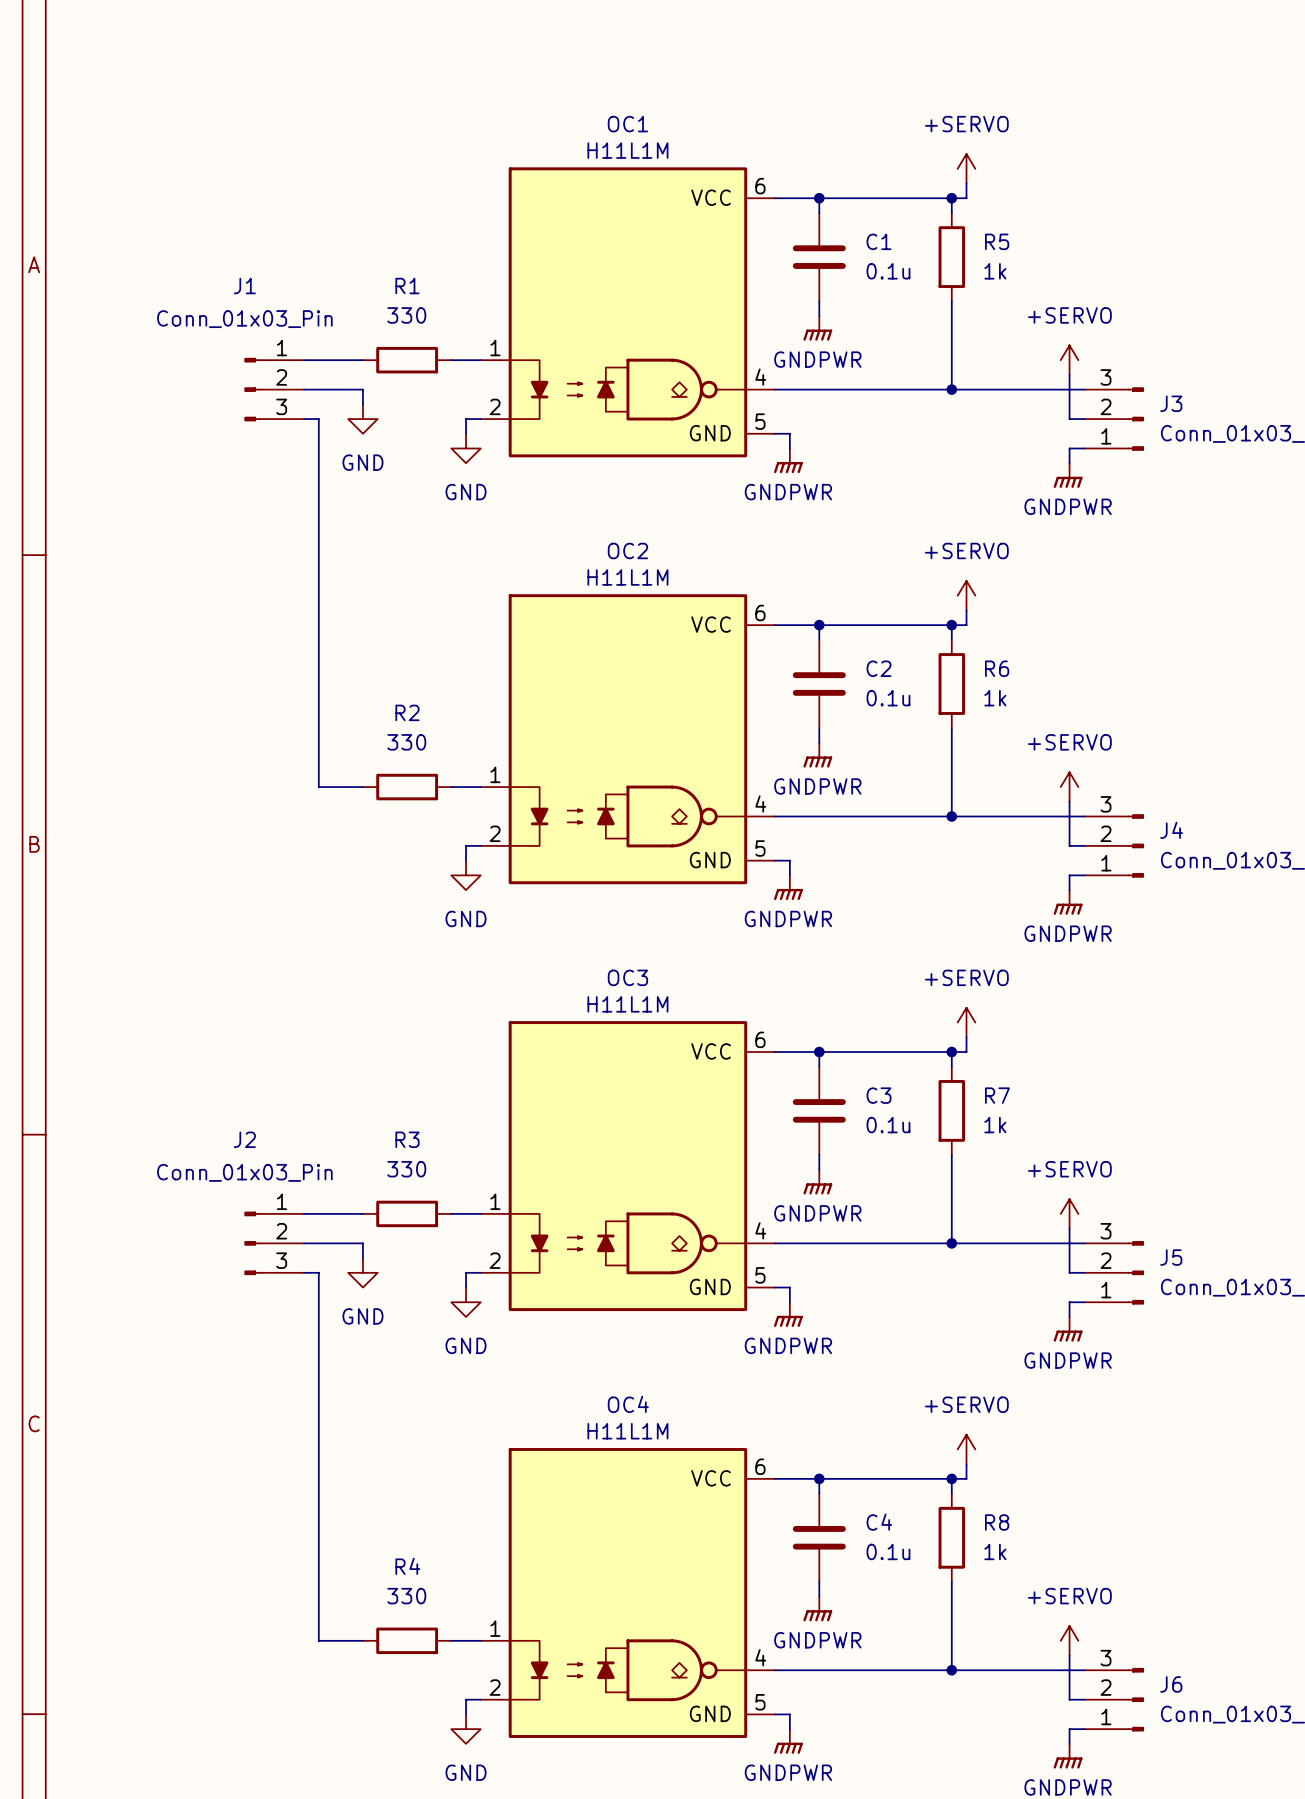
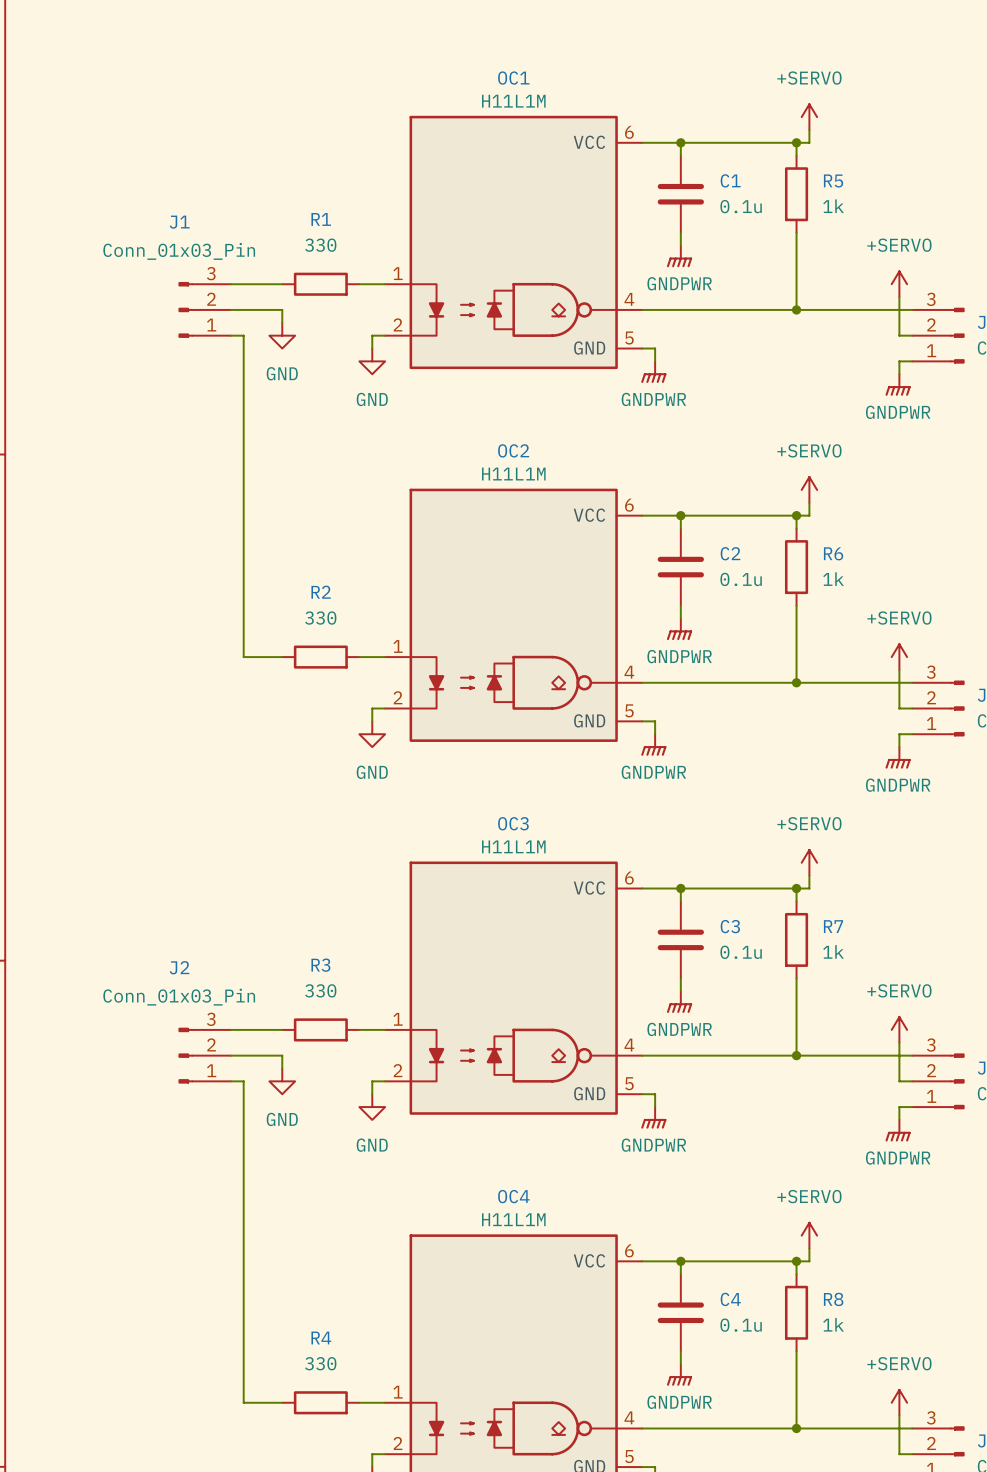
J1 flip: as is (252, 389) -> up-down (185, 309)
J2 flip: as is (252, 1243) -> up-down (185, 1055)

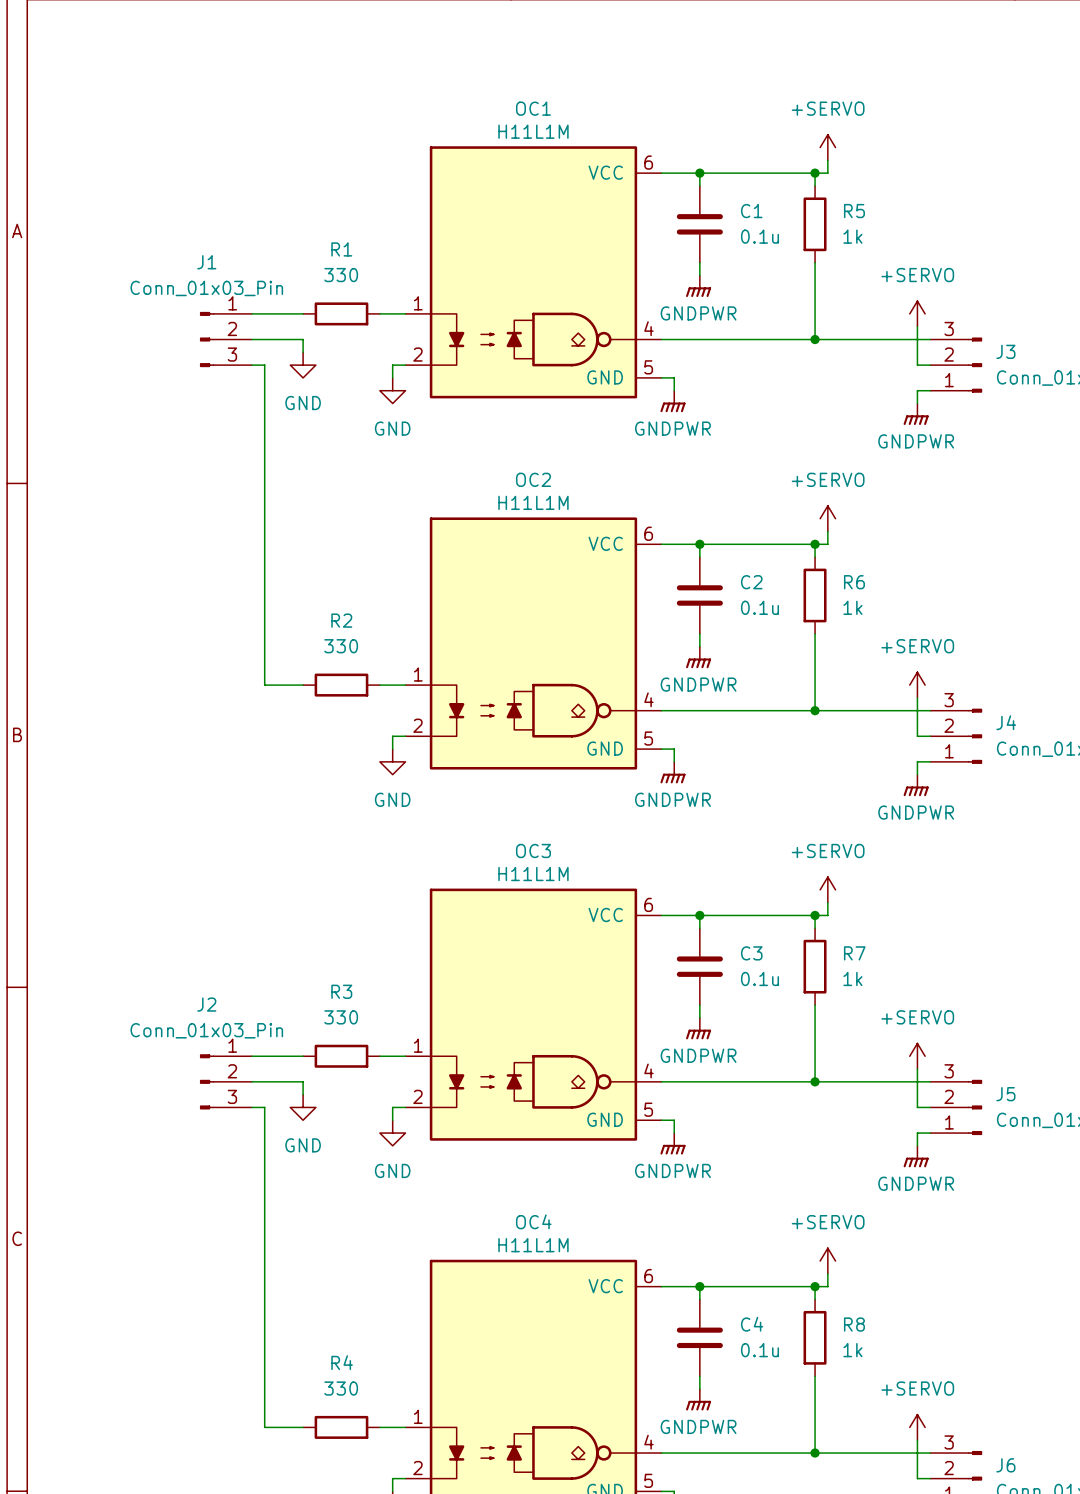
J1 flip: as is (185, 309) -> up-down (207, 339)
J2 flip: as is (185, 1055) -> up-down (207, 1081)

